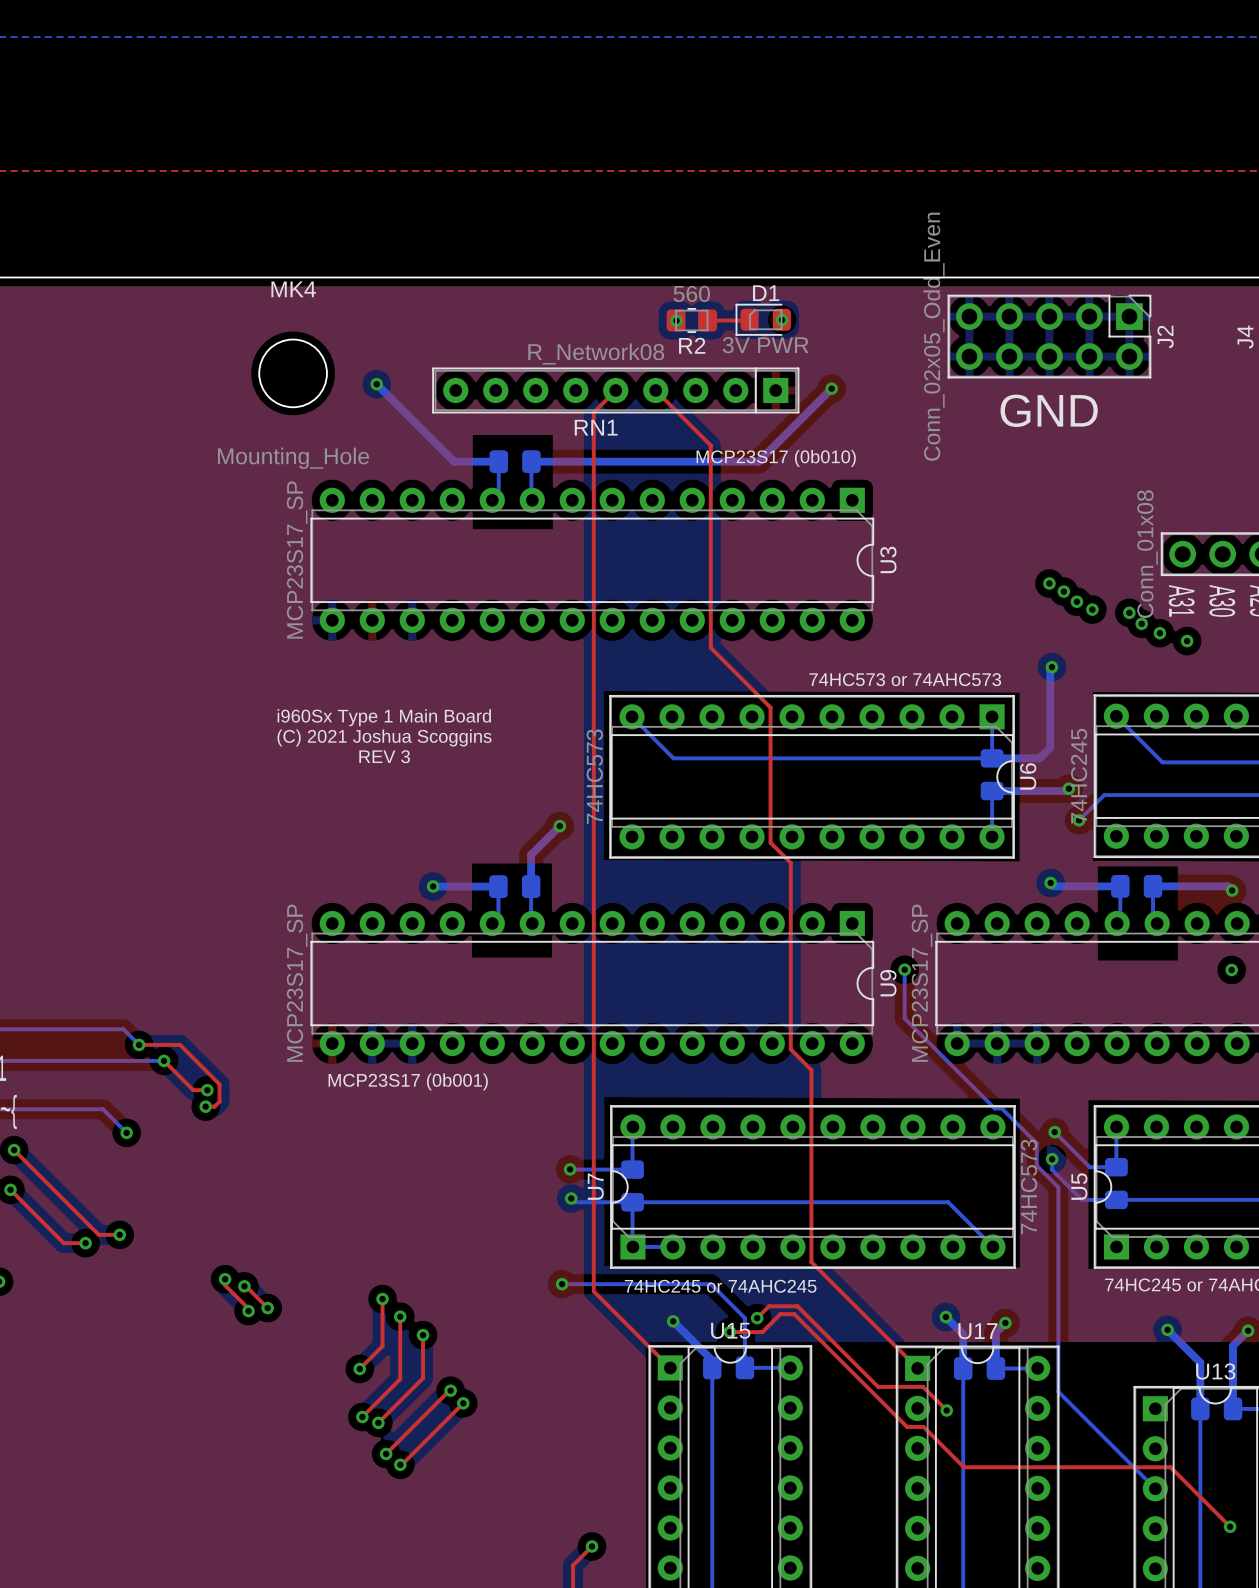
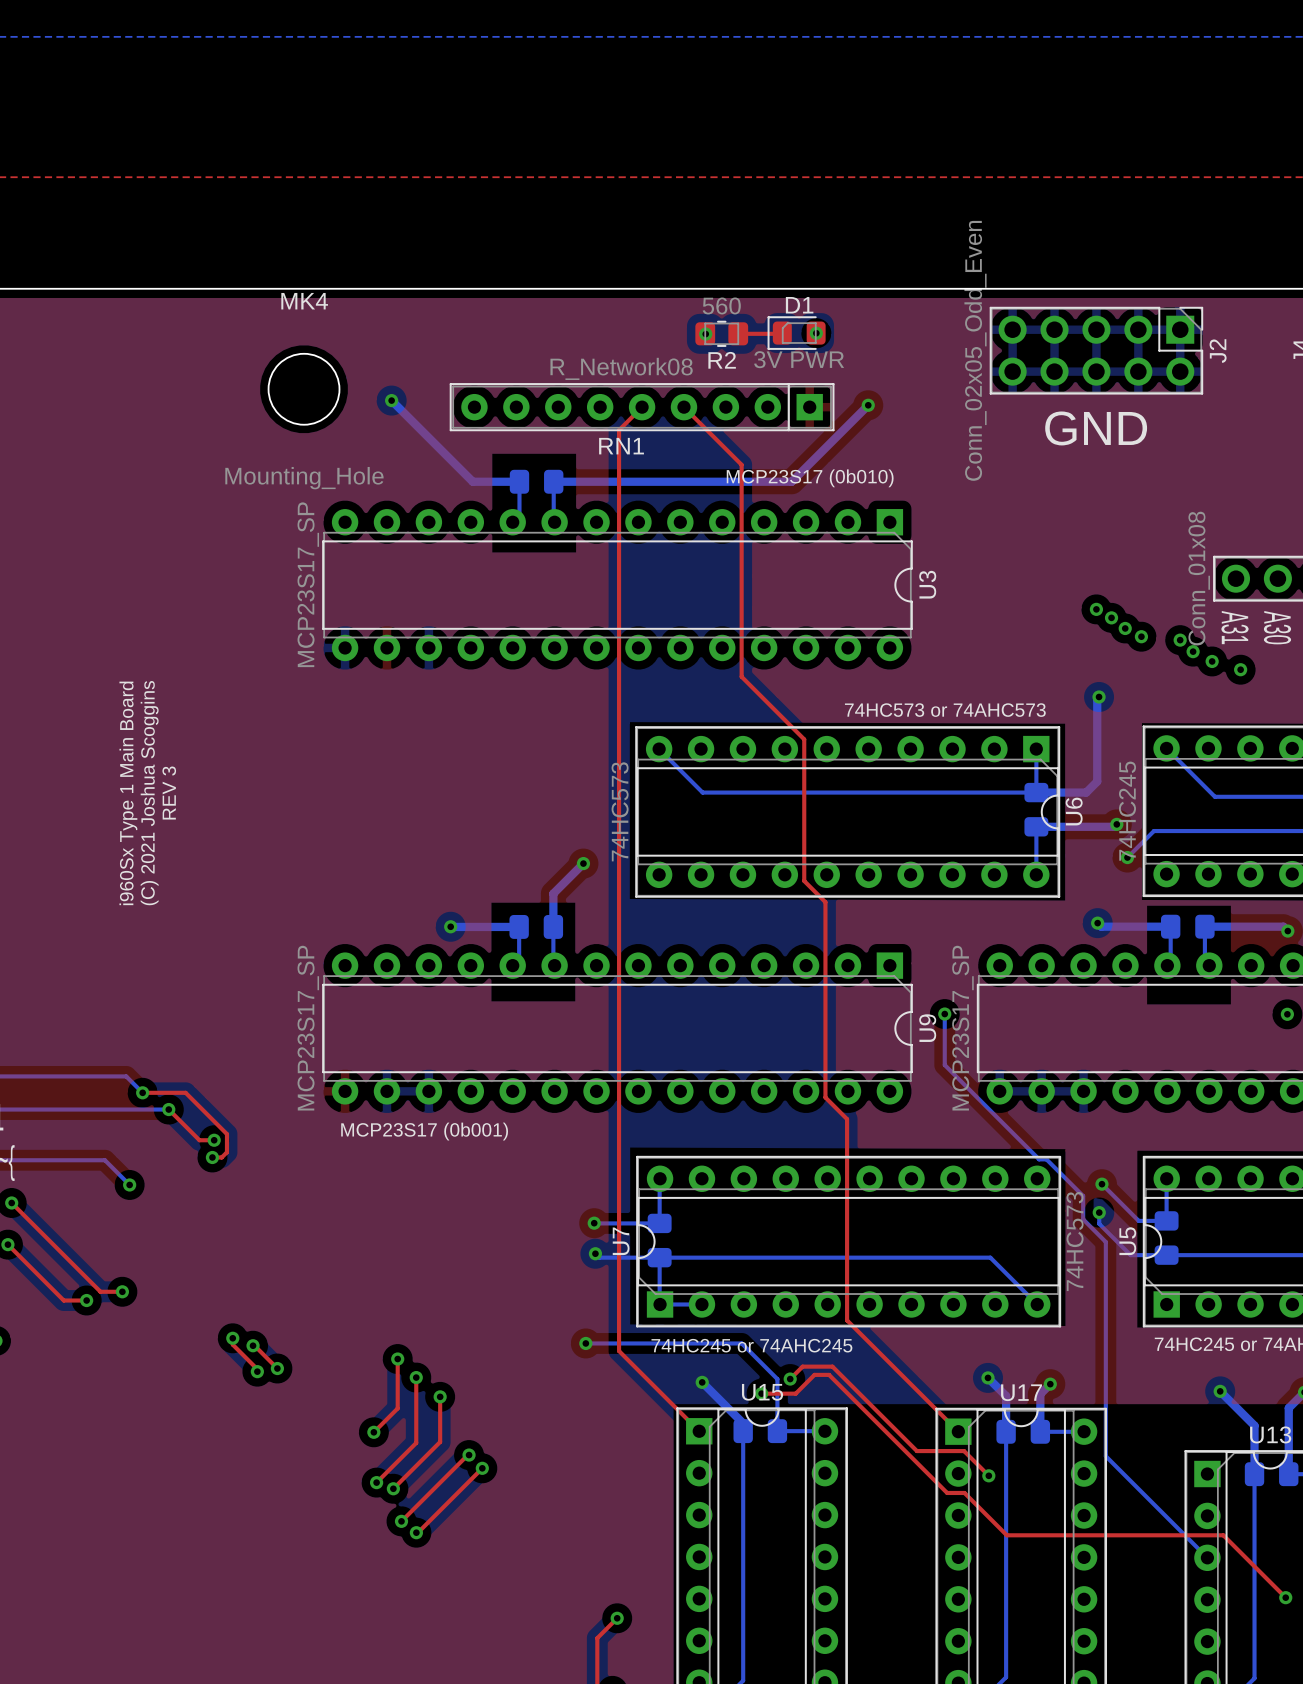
text rotation: 0° (384, 717) -> 90° counterclockwise (128, 793)
text rotation: 0° (384, 737) -> 90° counterclockwise (149, 793)
text rotation: 0° (384, 756) -> 90° counterclockwise (169, 793)
text position: REV 3 (384, 756) -> REV 3 (169, 793)

